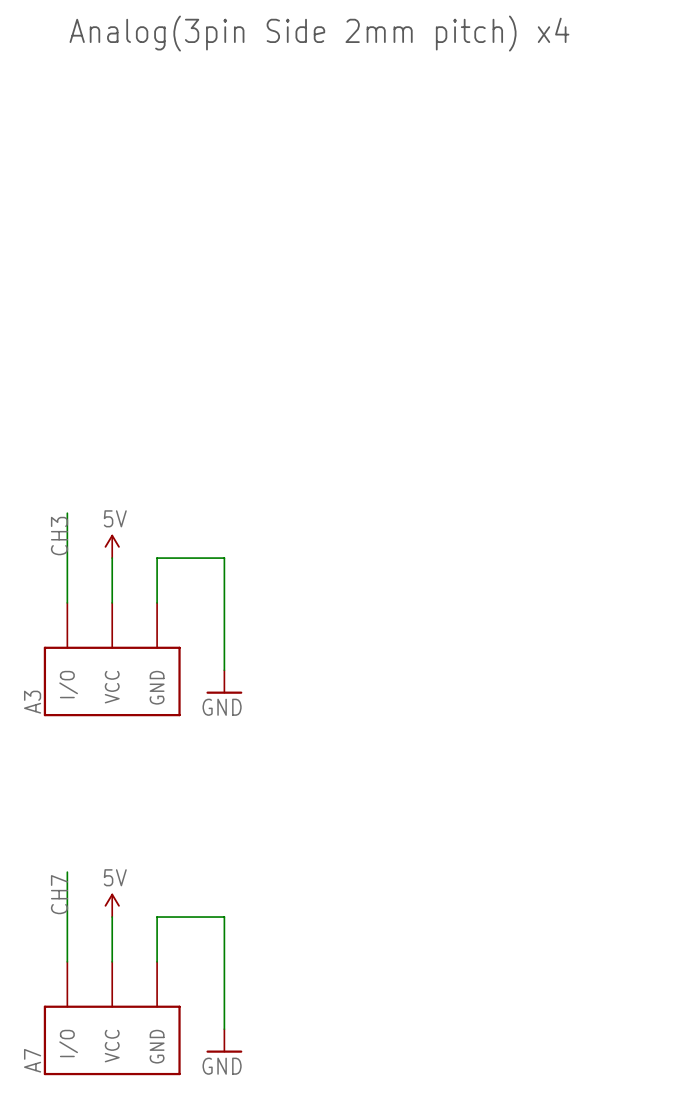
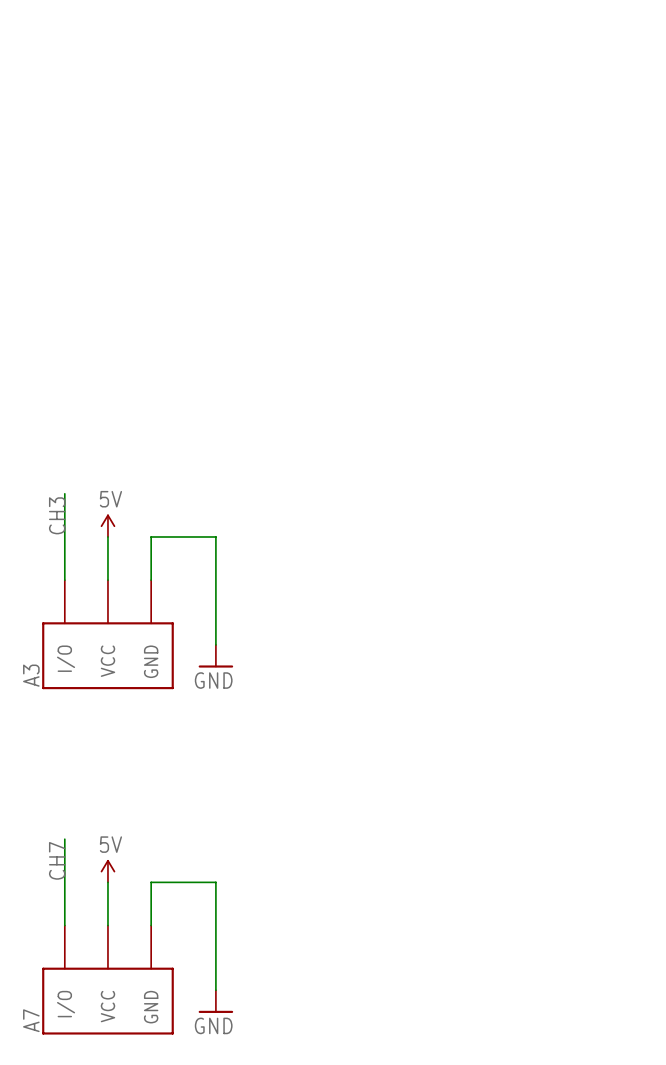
text: Analog(3pin Side 2mm pitch) x4 (319, 33) -> none

